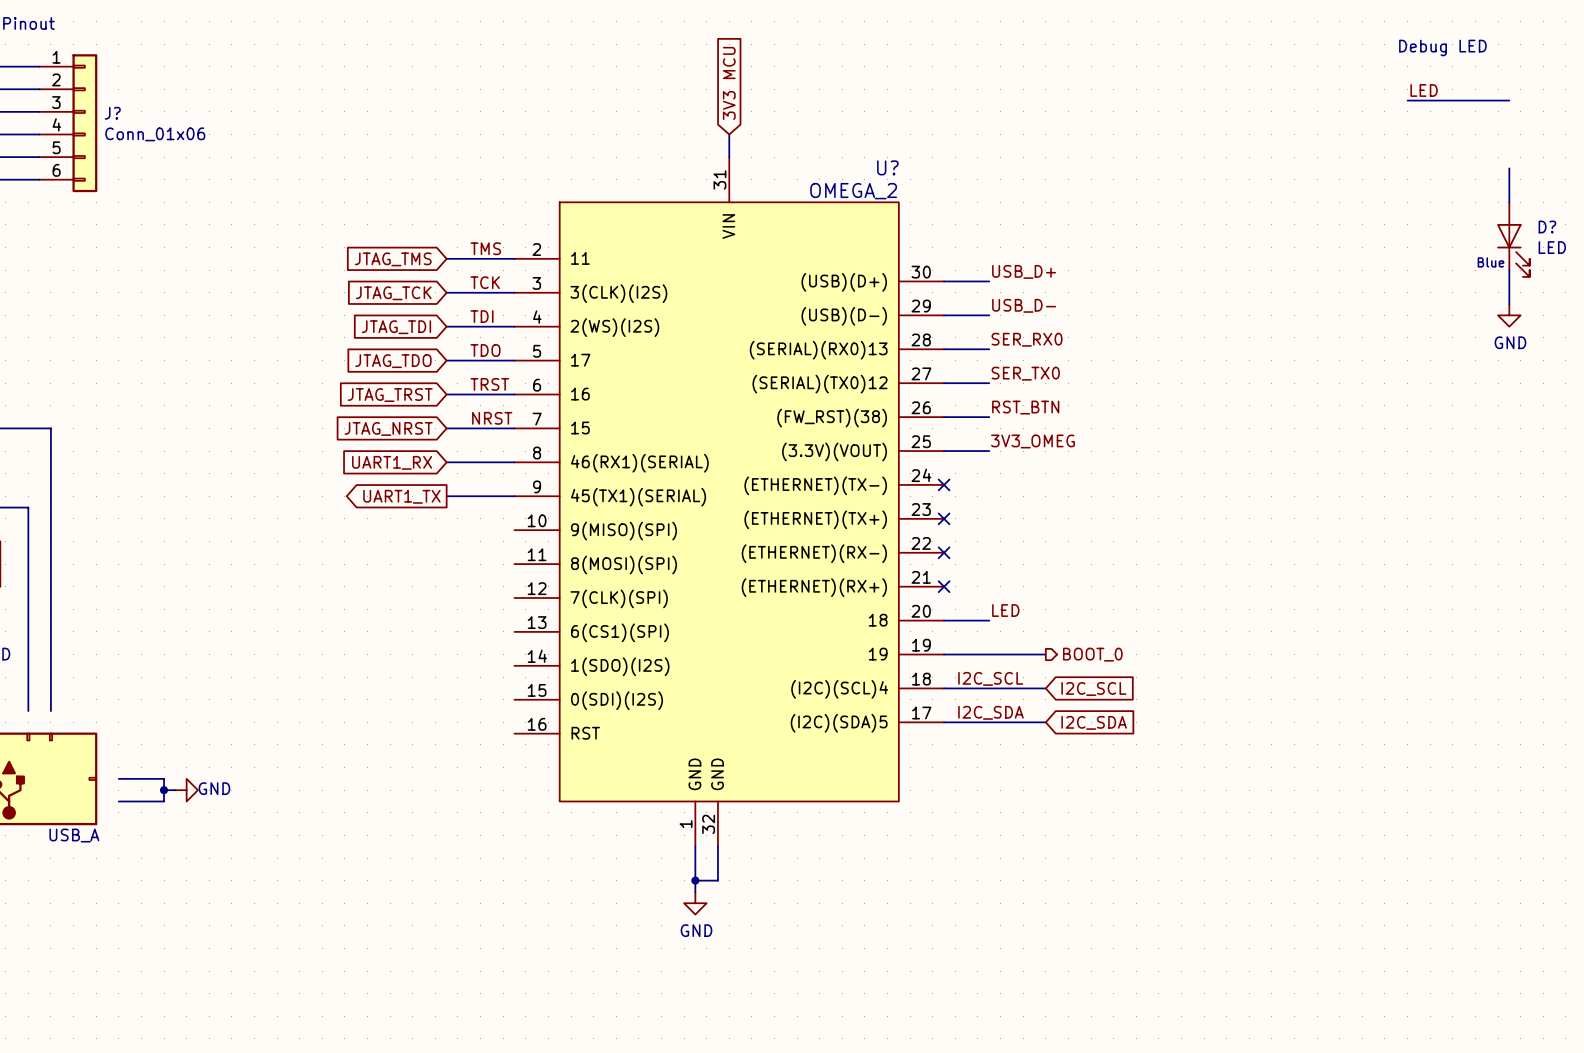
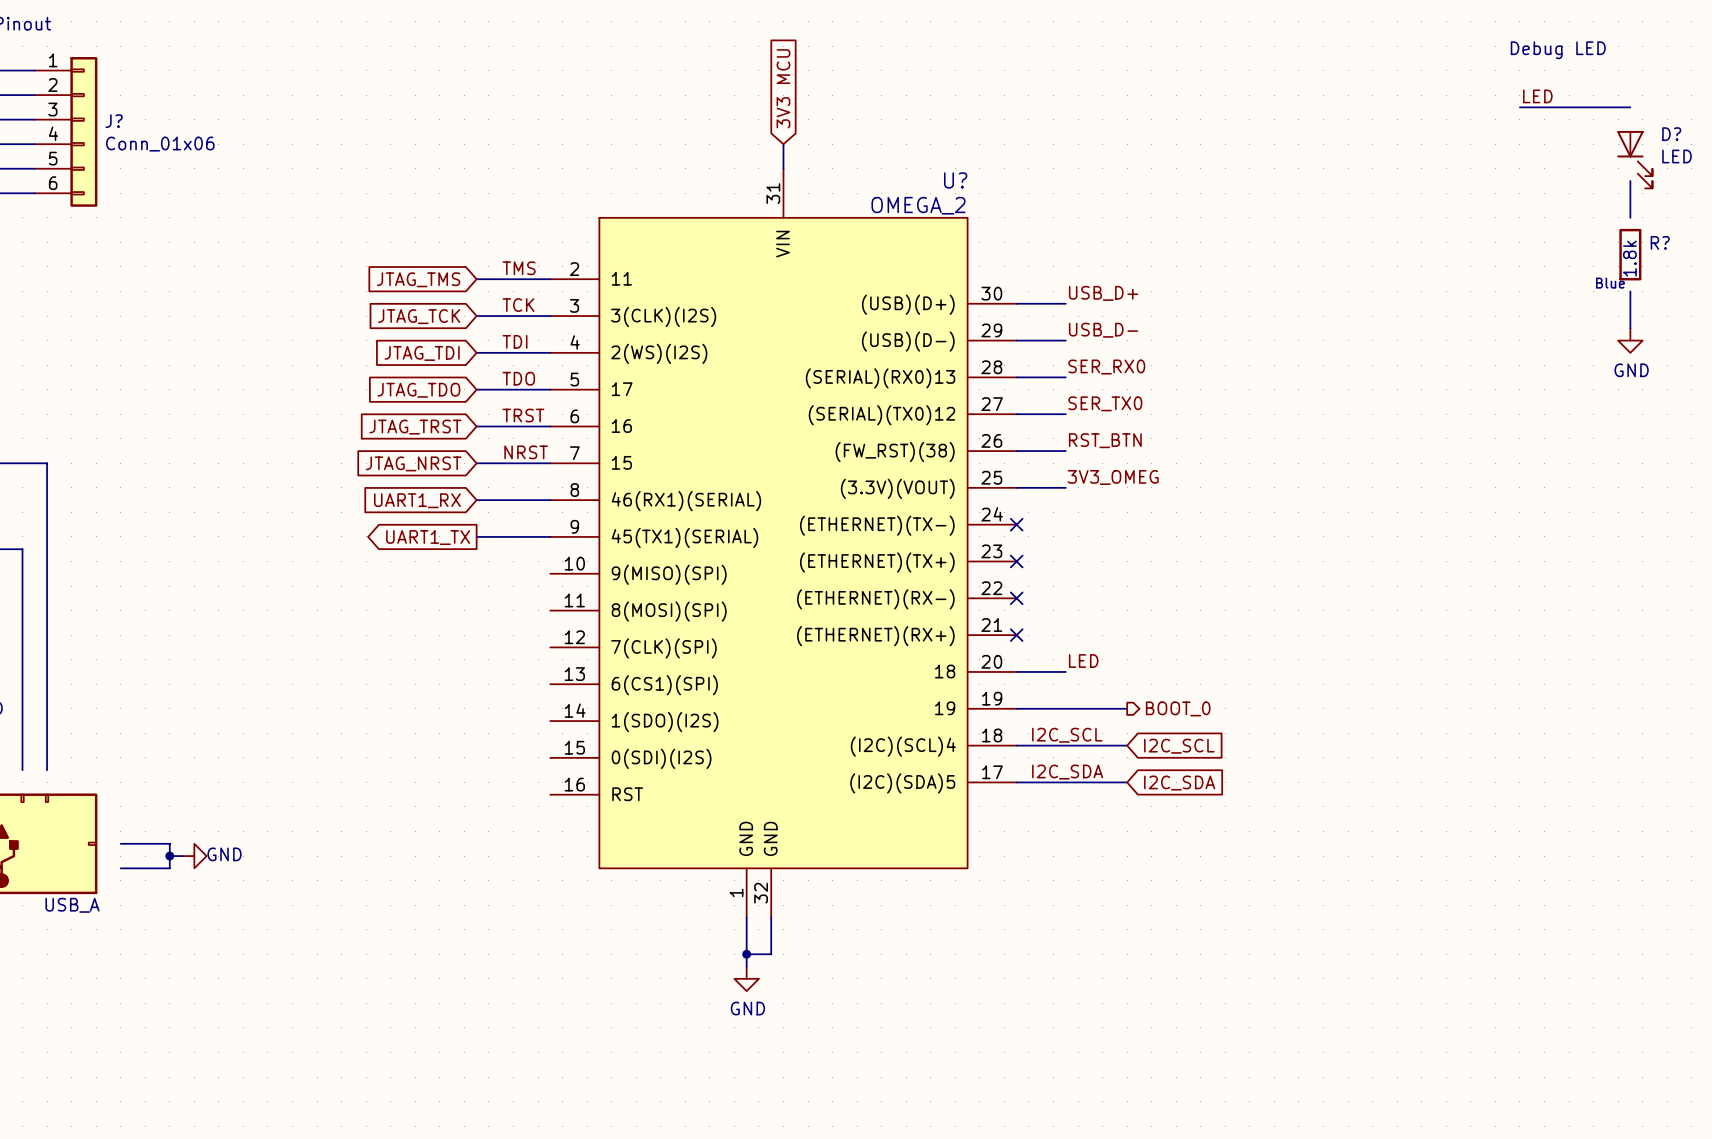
D?: none -> LED (1634, 159)
R?: none -> 1.8k (1630, 254)
D?: LED (1513, 239) -> none

